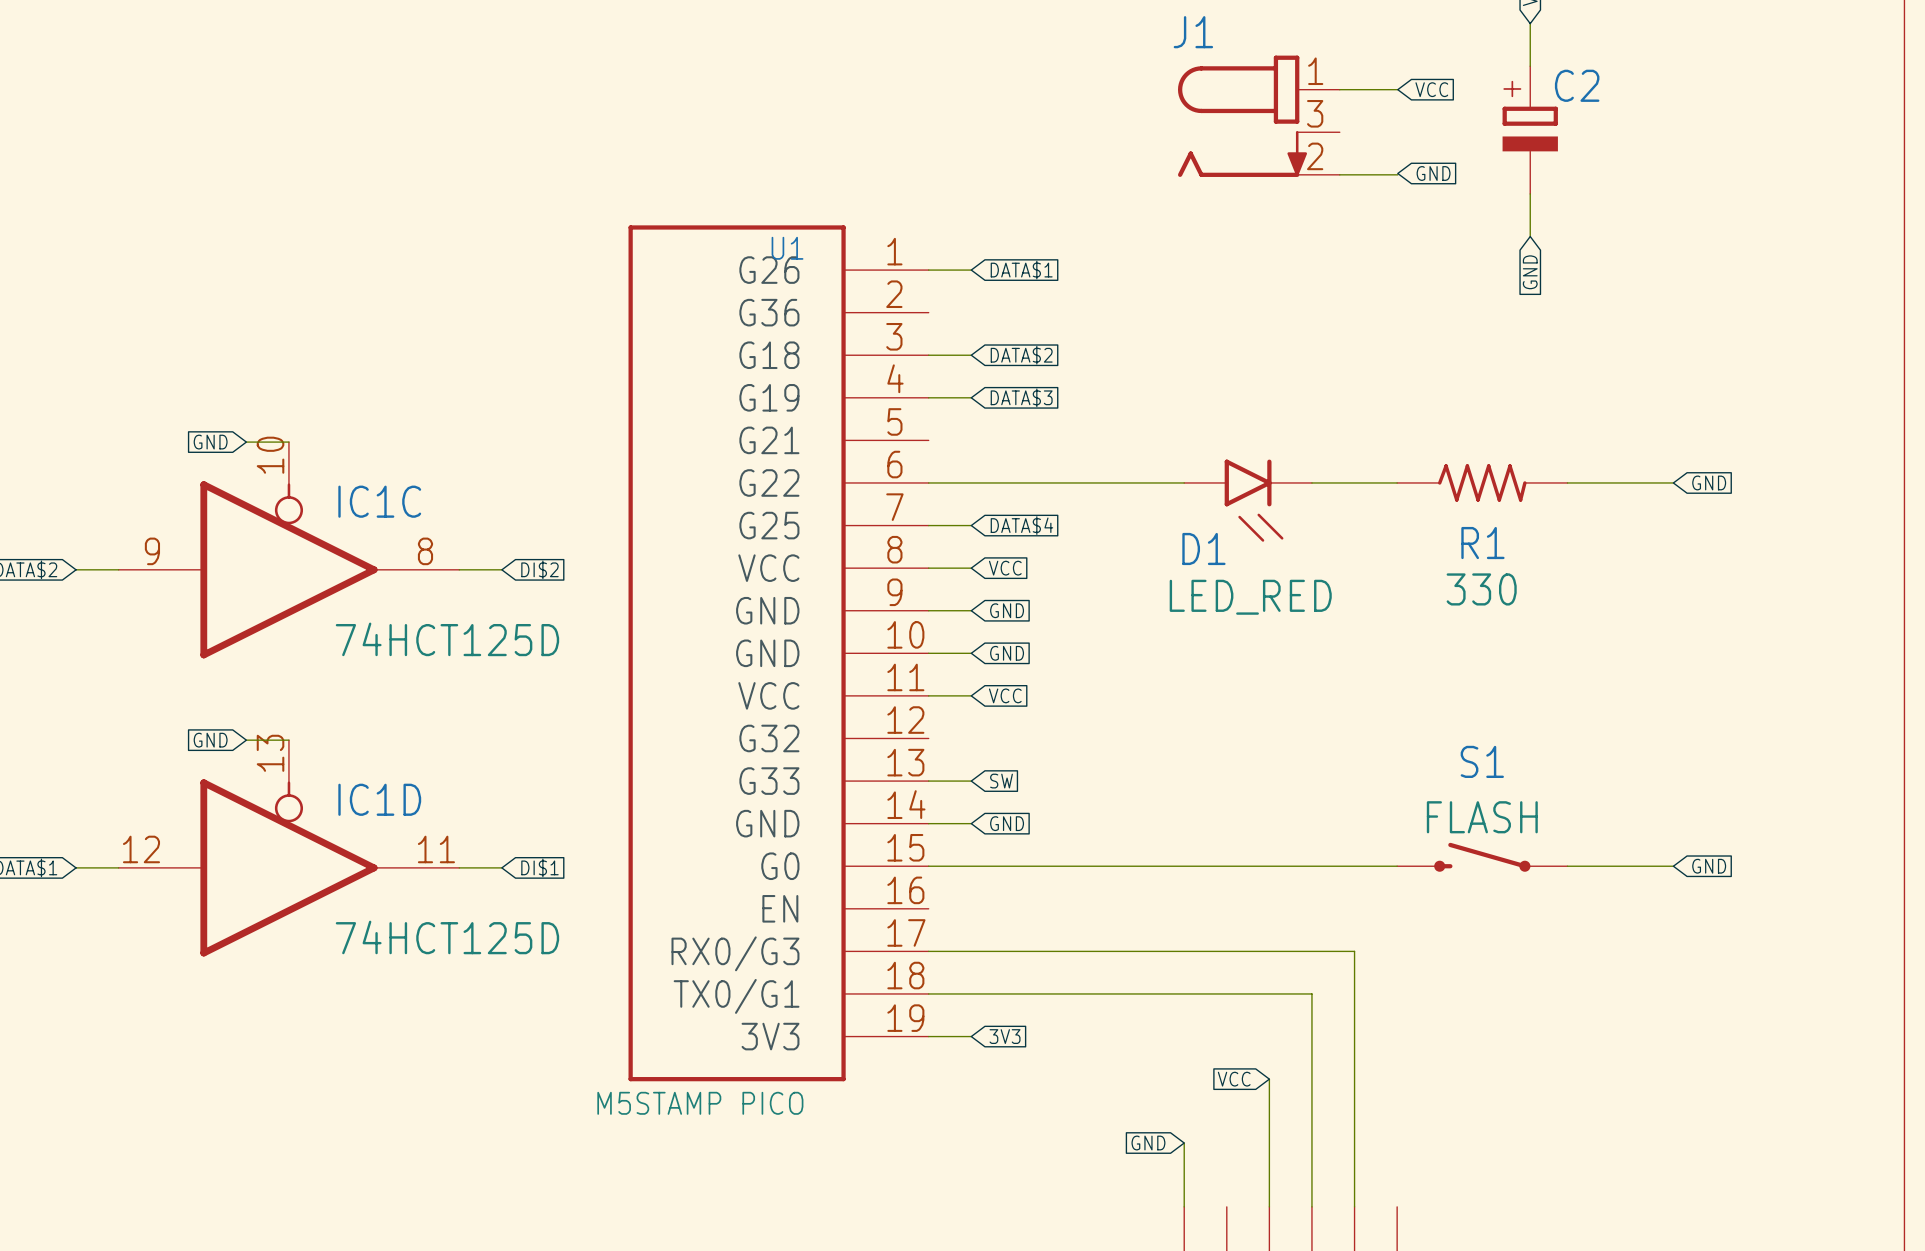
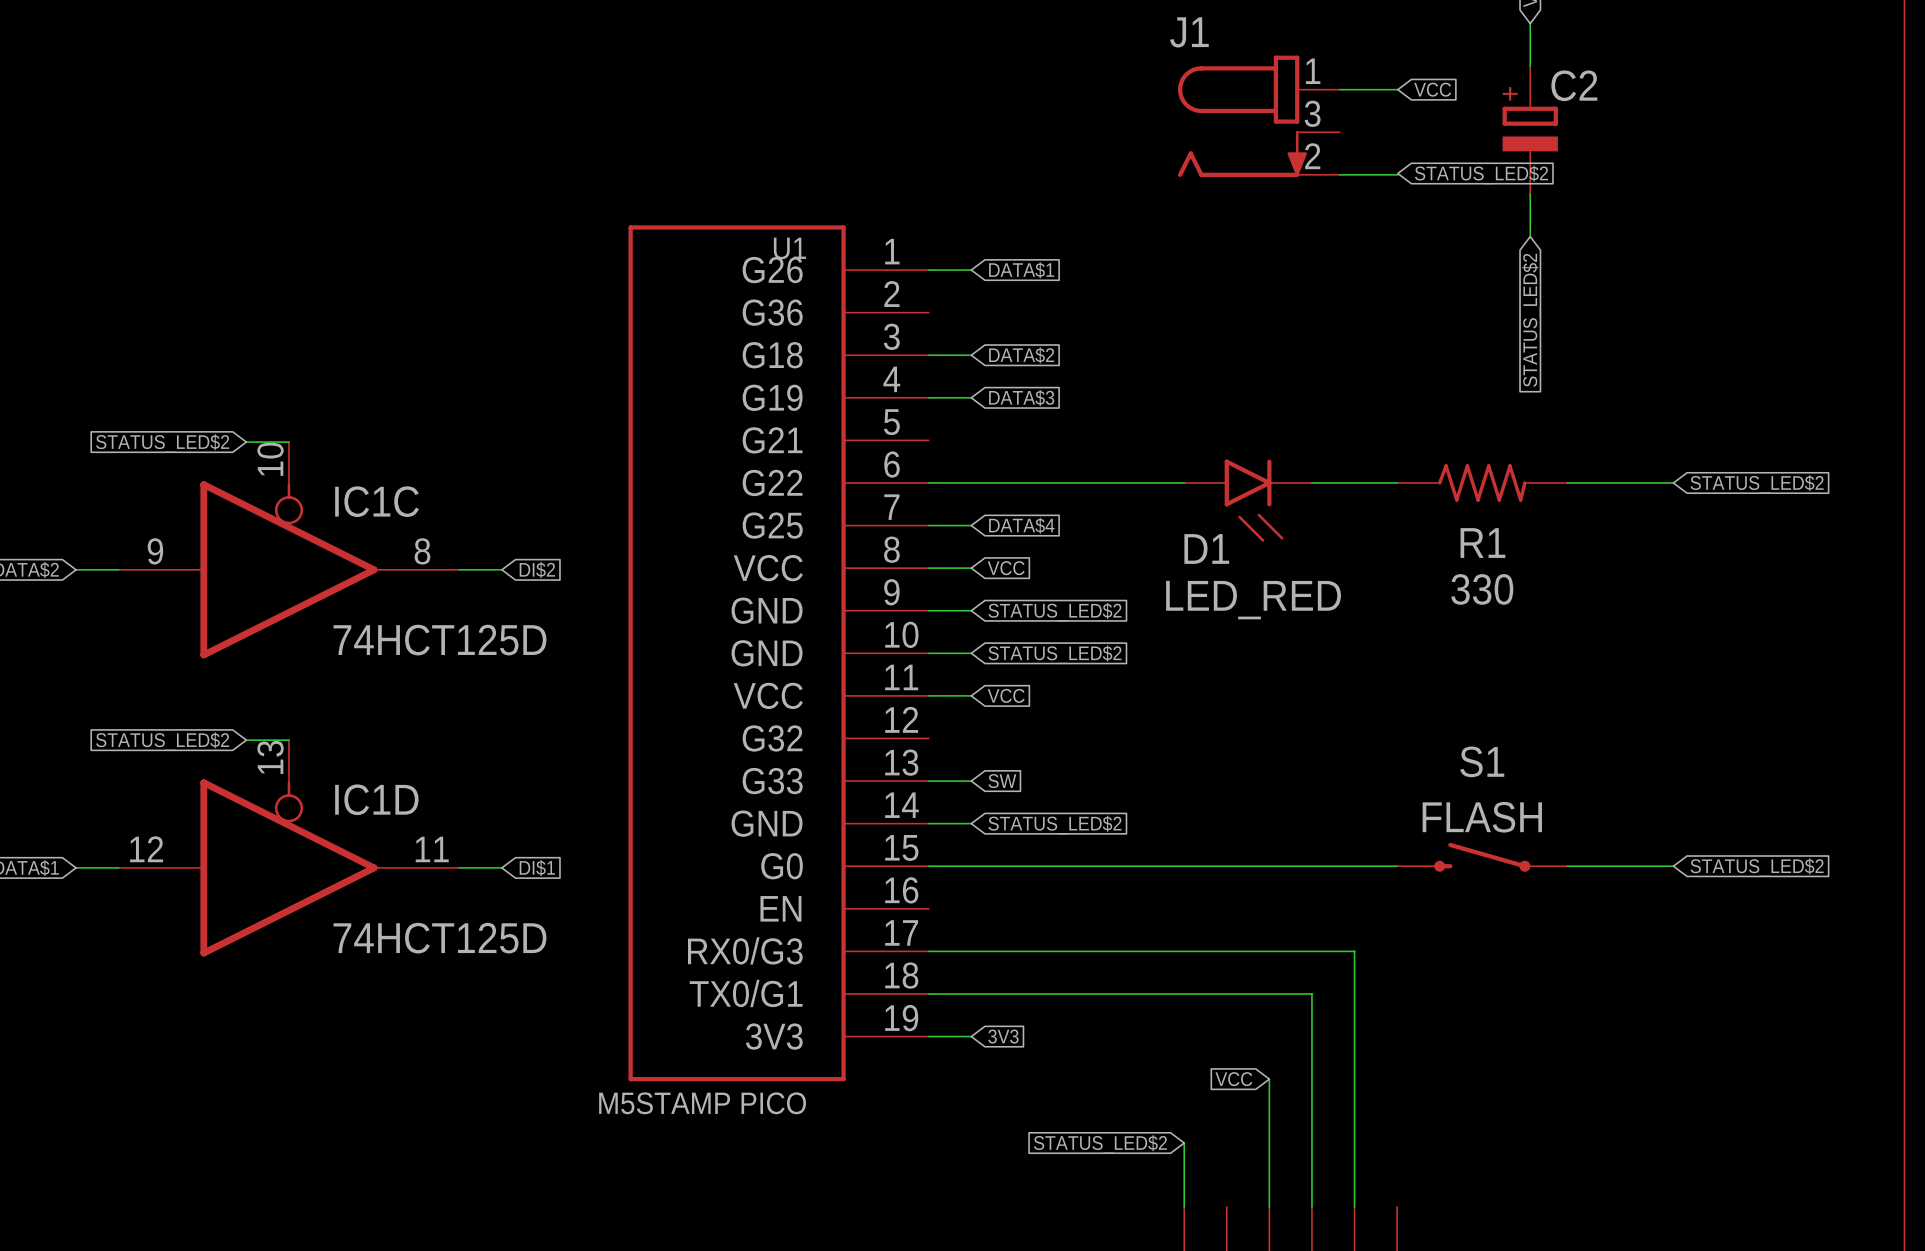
global label: GND (1433, 173) -> STATUS_LED$2 (1481, 174)
global label: GND (1530, 272) -> STATUS_LED$2 (1531, 320)
global label: GND (210, 442) -> STATUS_LED$2 (162, 443)
global label: GND (1709, 482) -> STATUS_LED$2 (1757, 484)
global label: GND (1007, 610) -> STATUS_LED$2 (1054, 612)
global label: GND (1007, 653) -> STATUS_LED$2 (1054, 654)
global label: GND (210, 740) -> STATUS_LED$2 (162, 741)
global label: GND (1007, 823) -> STATUS_LED$2 (1054, 825)
global label: GND (1709, 866) -> STATUS_LED$2 (1757, 867)
global label: GND (1148, 1143) -> STATUS_LED$2 (1100, 1144)

